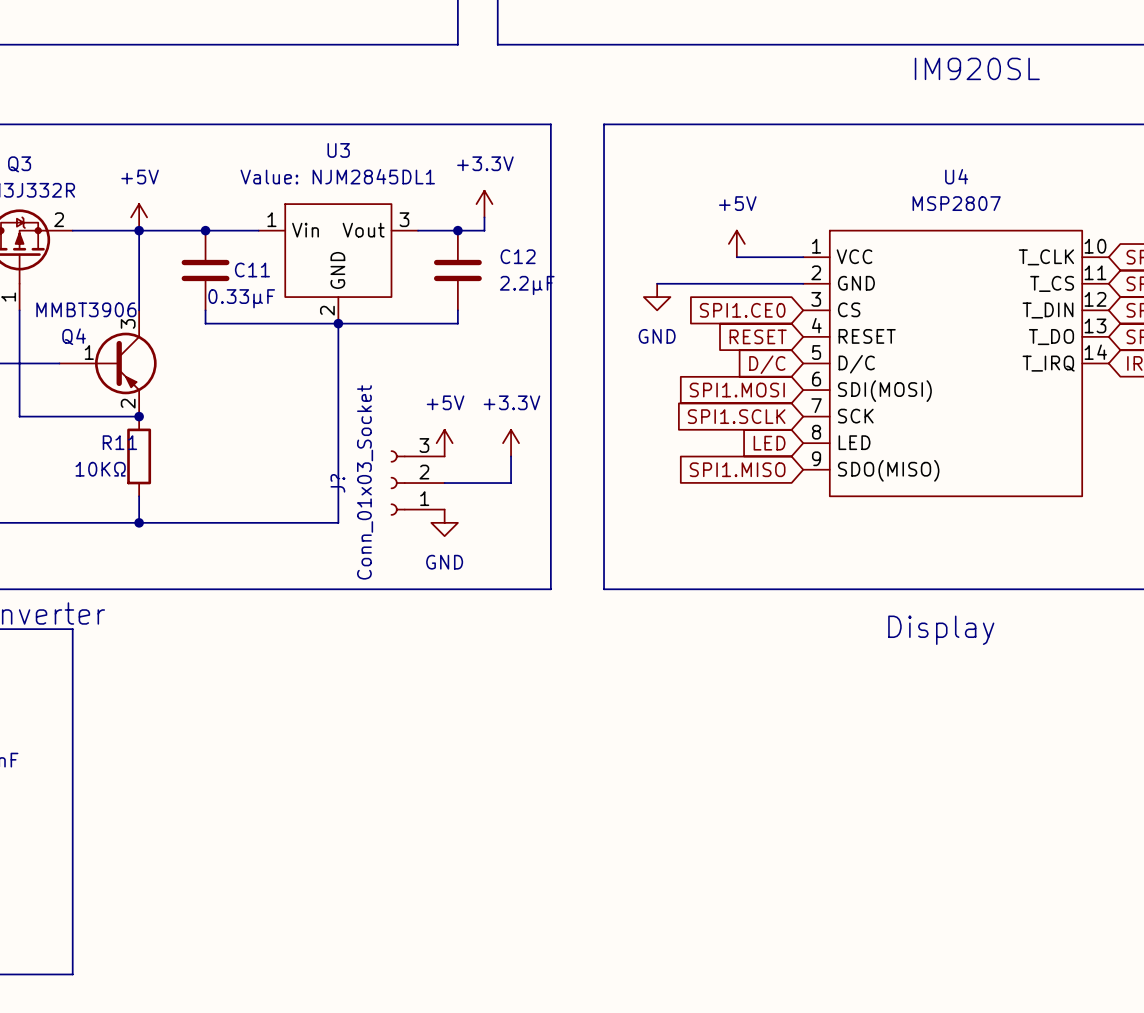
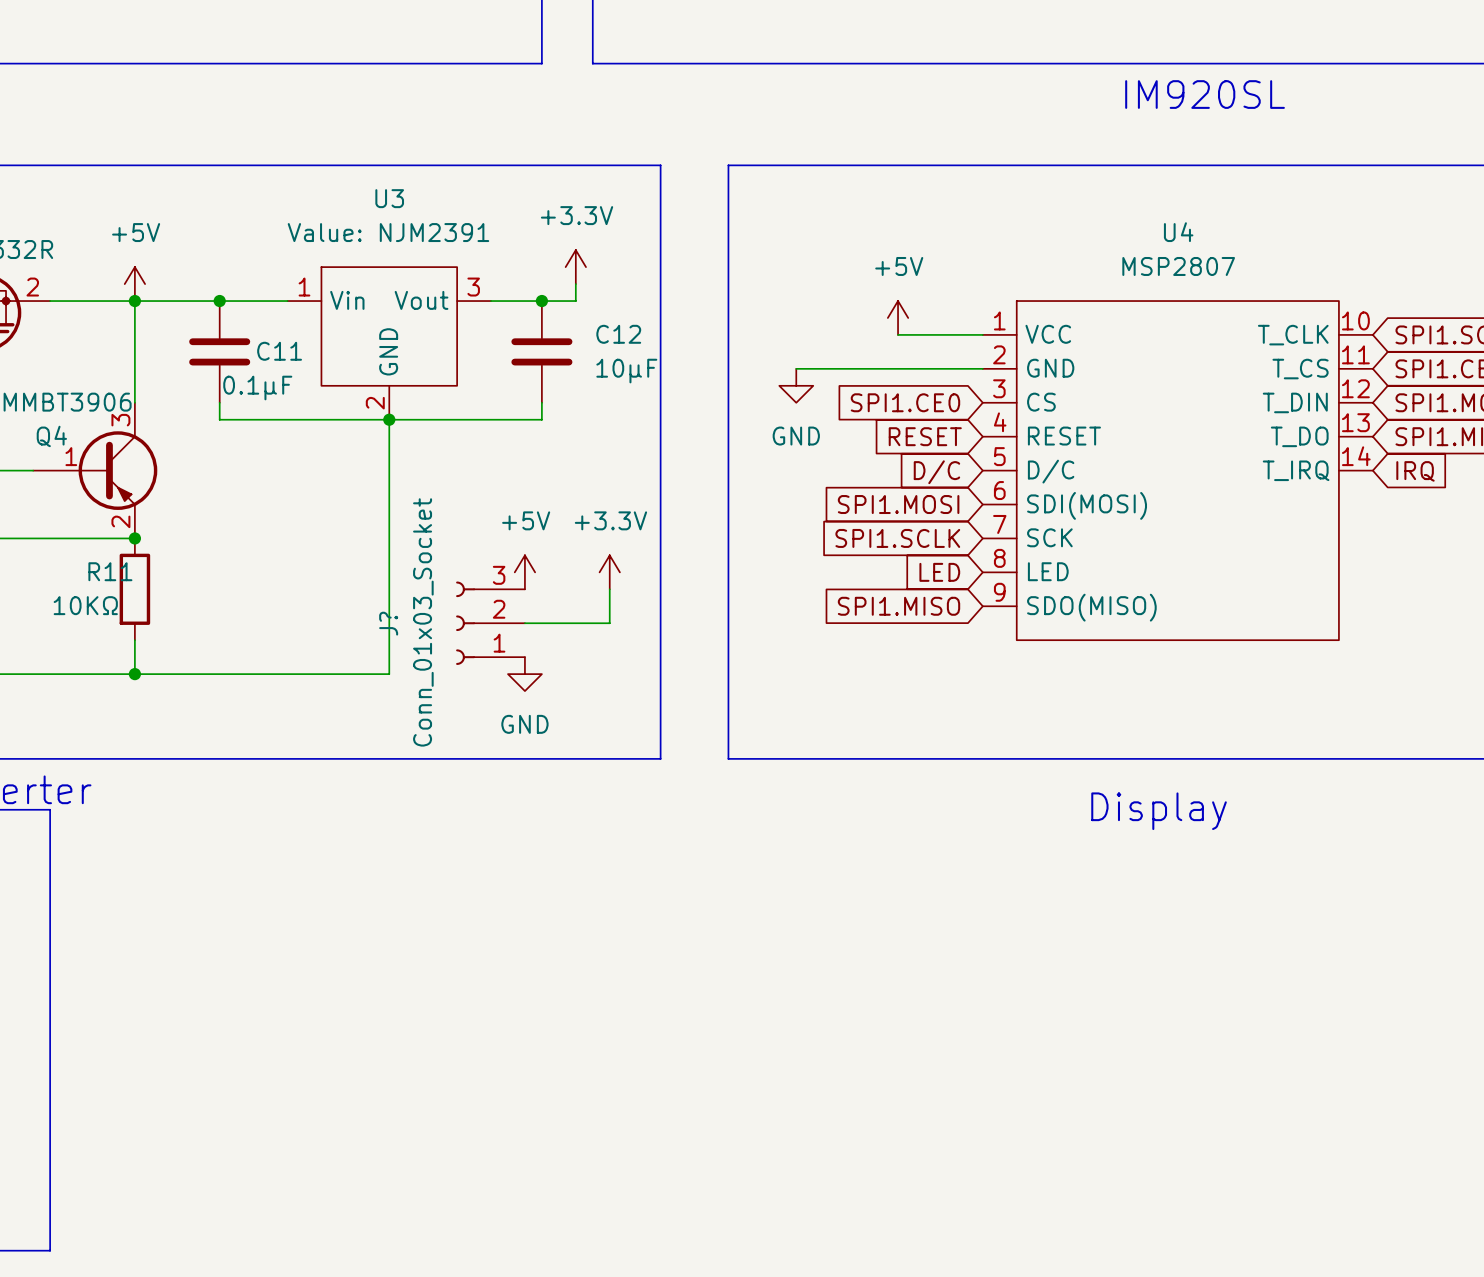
U3 value: Value: NJM2845DL1 (337, 176) -> Value: NJM2391 (388, 232)
C12 value: 2.2µF (527, 285) -> 10µF (626, 371)
C11 value: 0.33μF (241, 298) -> 0.1μF (257, 388)

